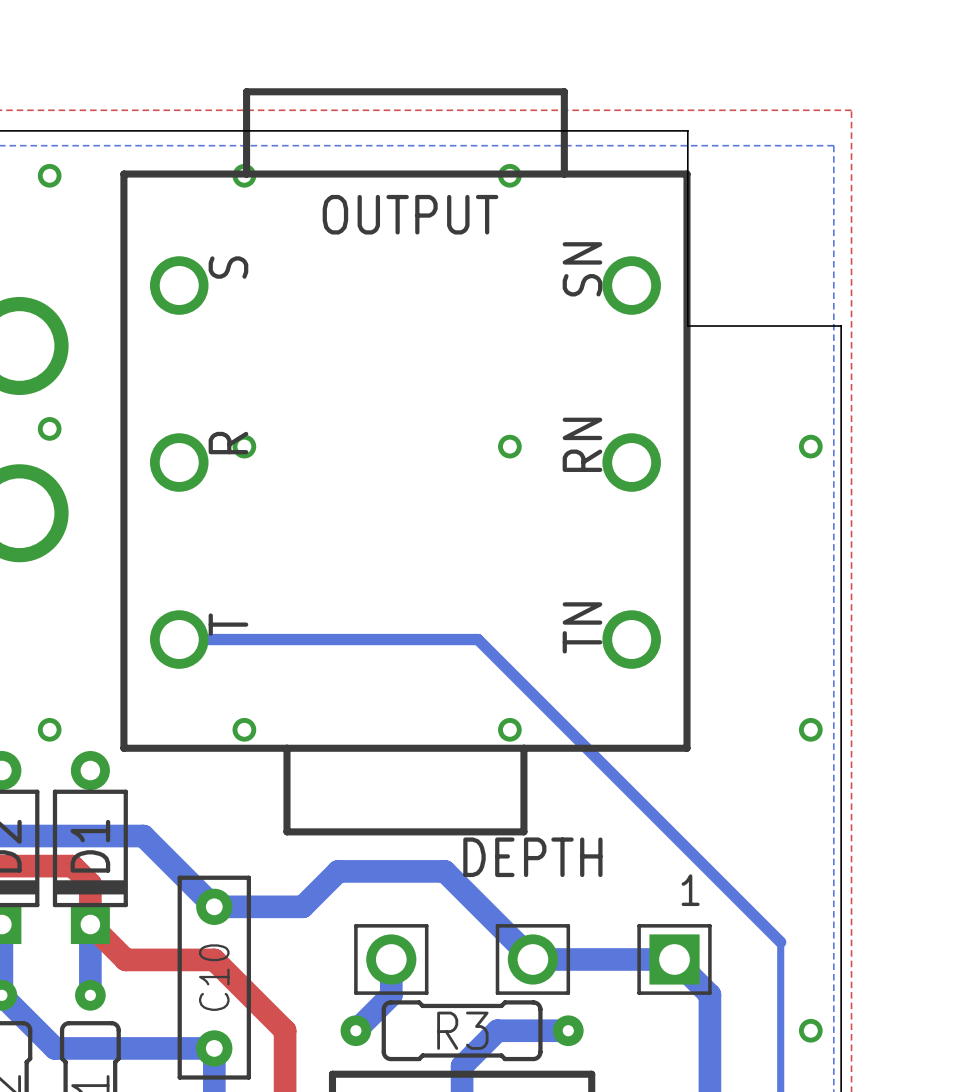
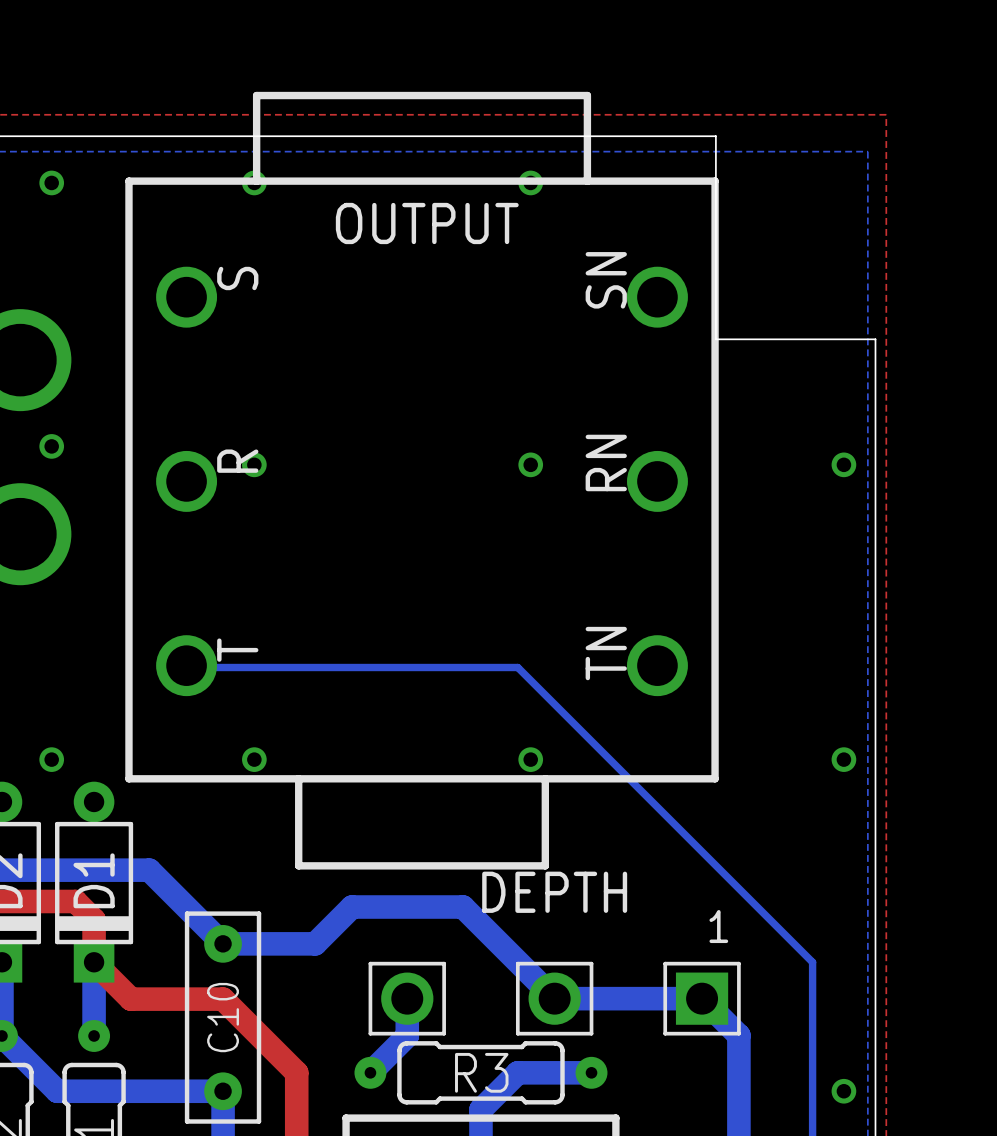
bottom track: (179, 639) (478, 639) (780, 942) -> (186, 665) (188, 667) (517, 667) (812, 962) (812, 980)
via position: (810, 1030) -> (843, 1091)

